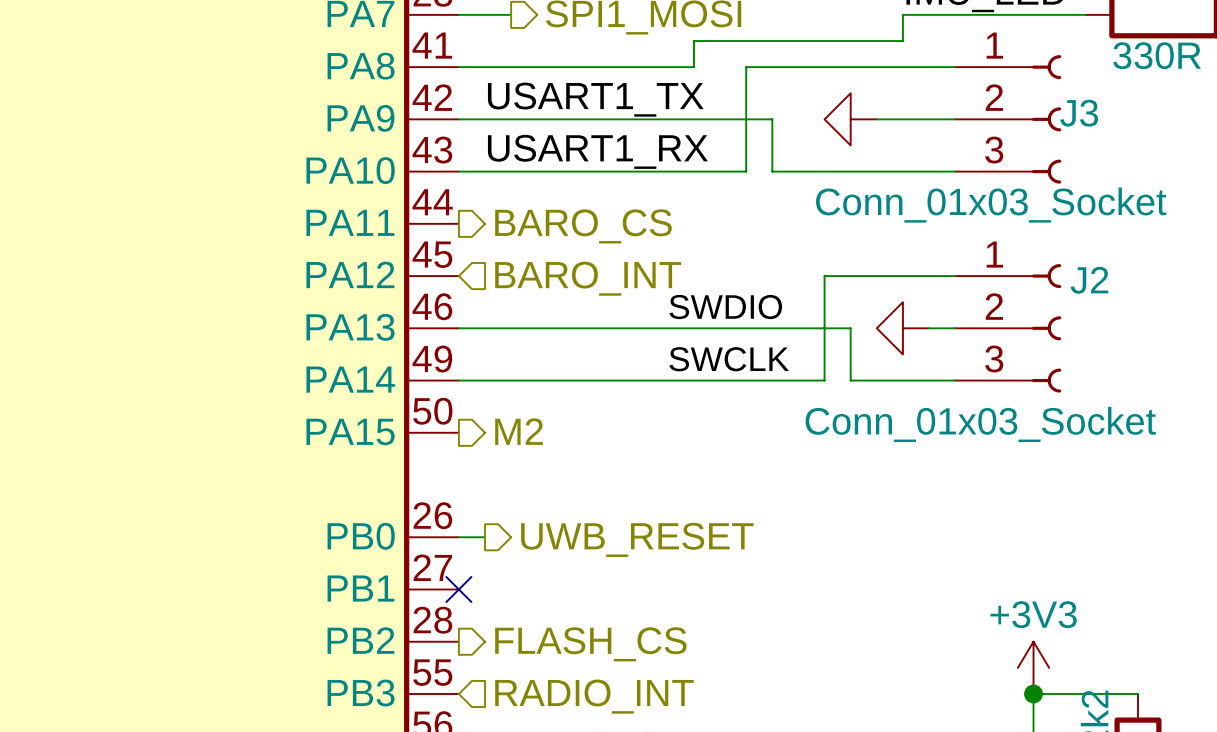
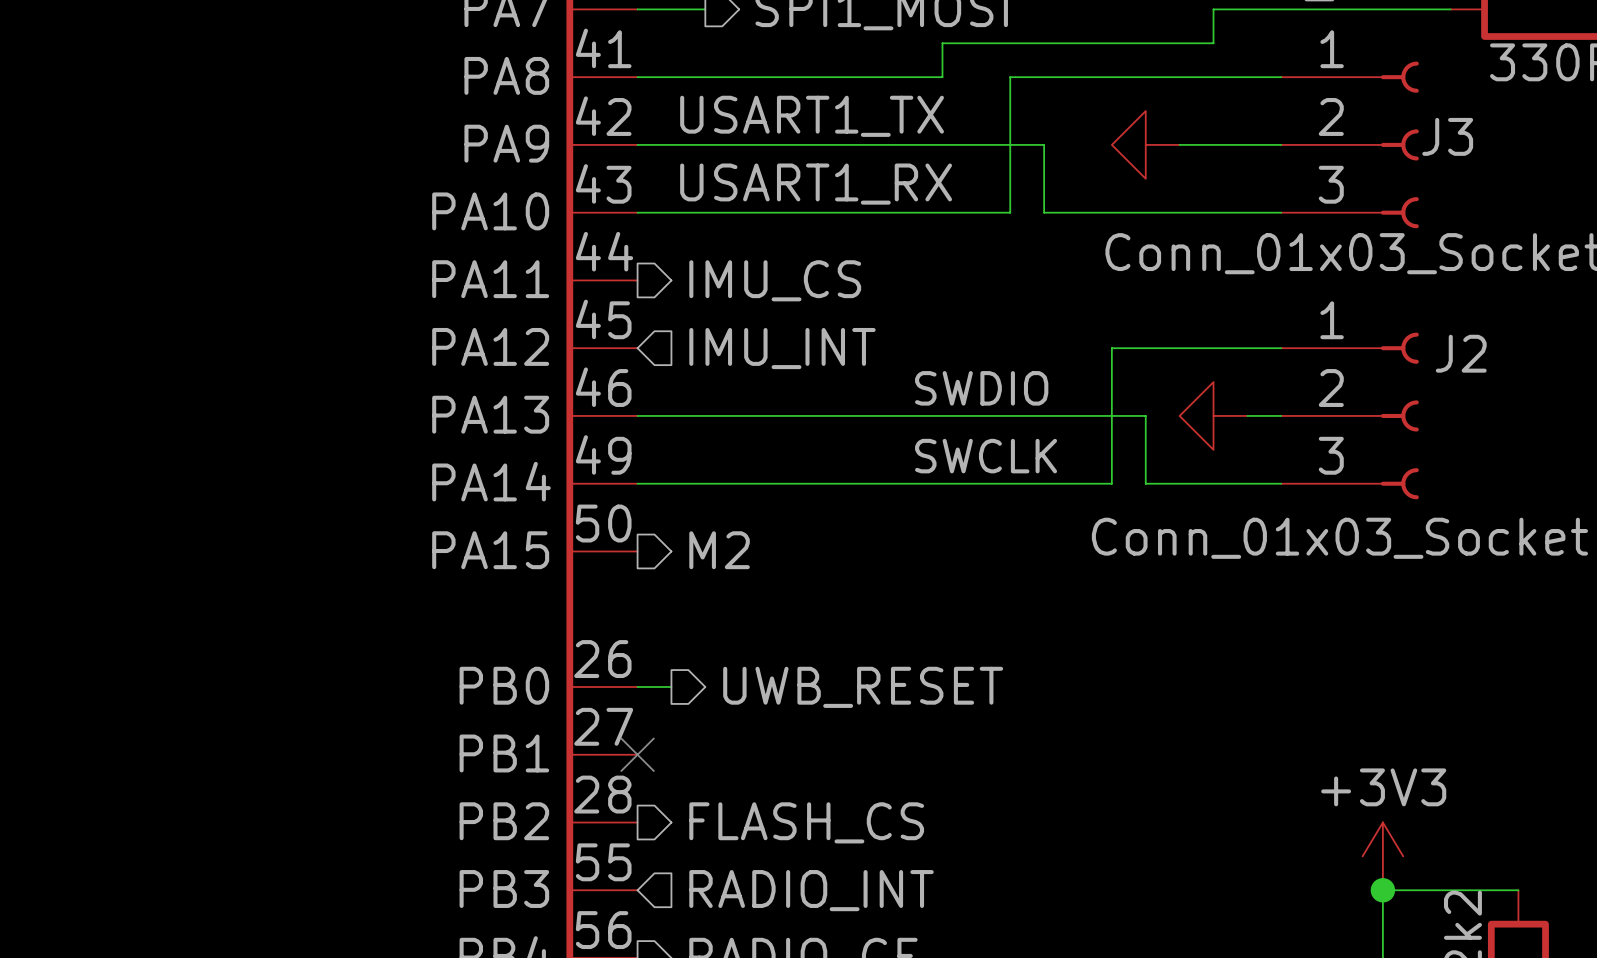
hierarchical label: BARO_CS (583, 226) -> IMU_CS (775, 280)
hierarchical label: BARO_INT (588, 278) -> IMU_INT (782, 348)

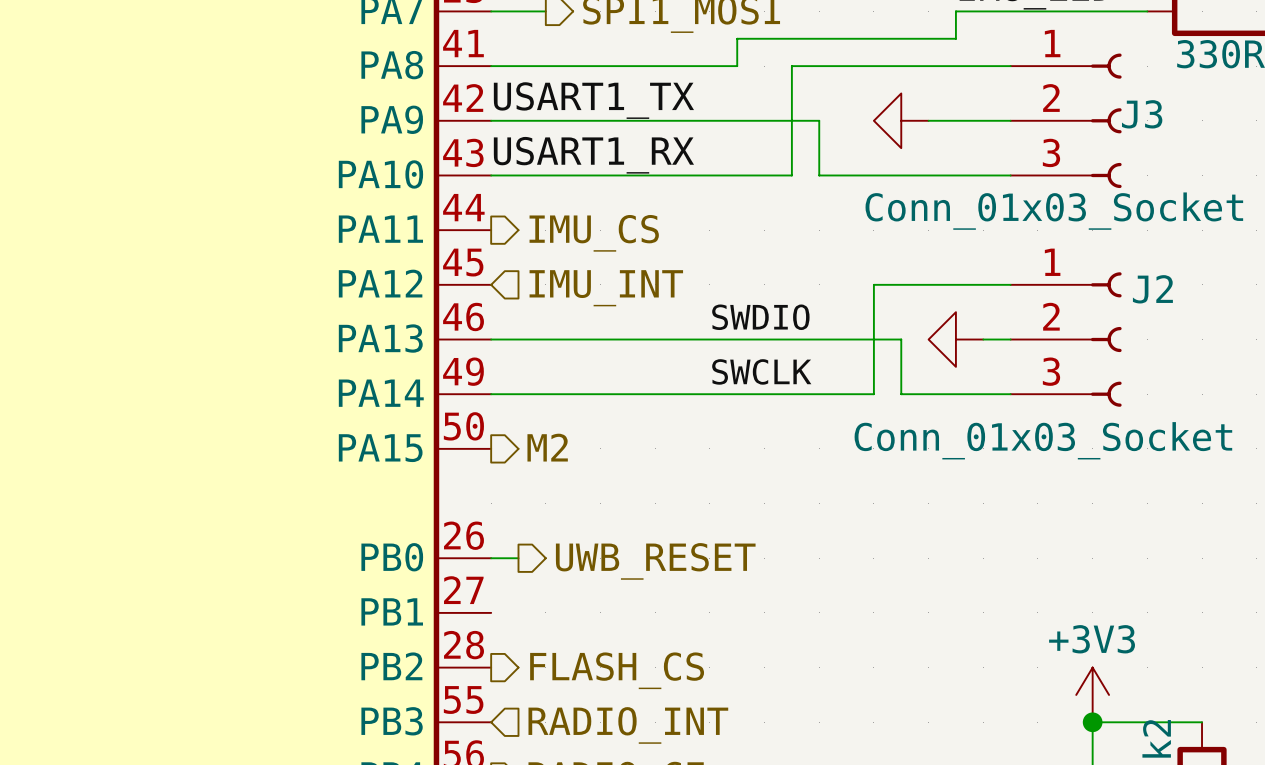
label position: USART1_TX (812, 116) -> USART1_TX (593, 100)
label position: USART1_RX (816, 184) -> USART1_RX (593, 155)
no-connect mark: (637, 754) -> none

